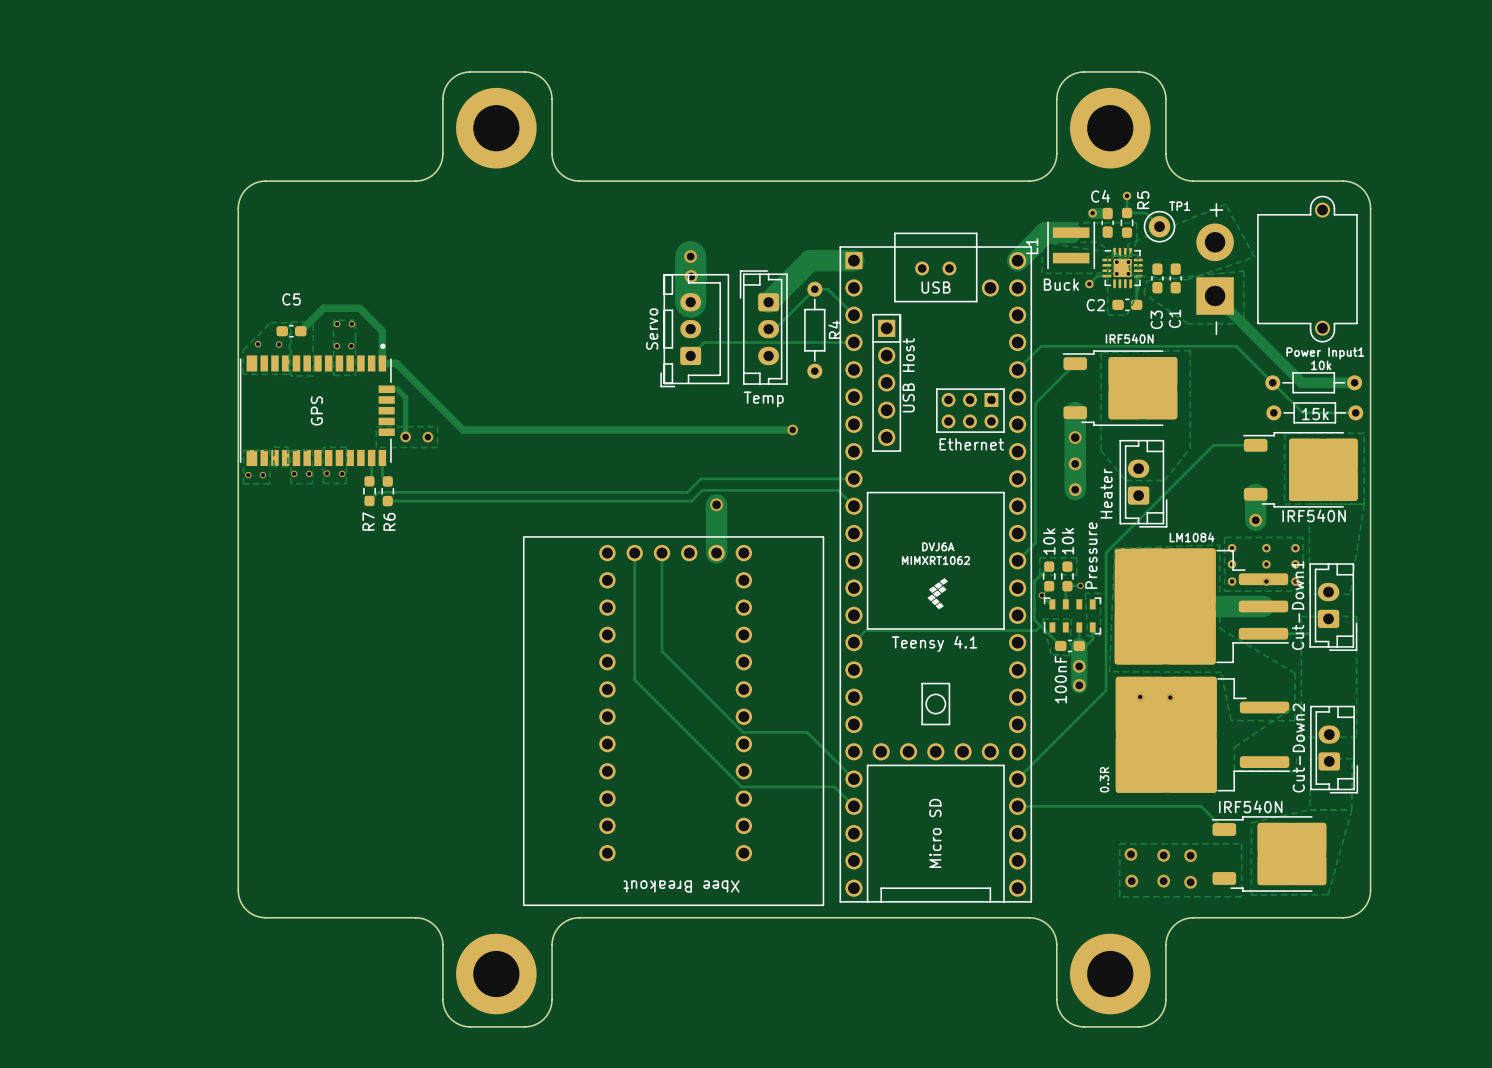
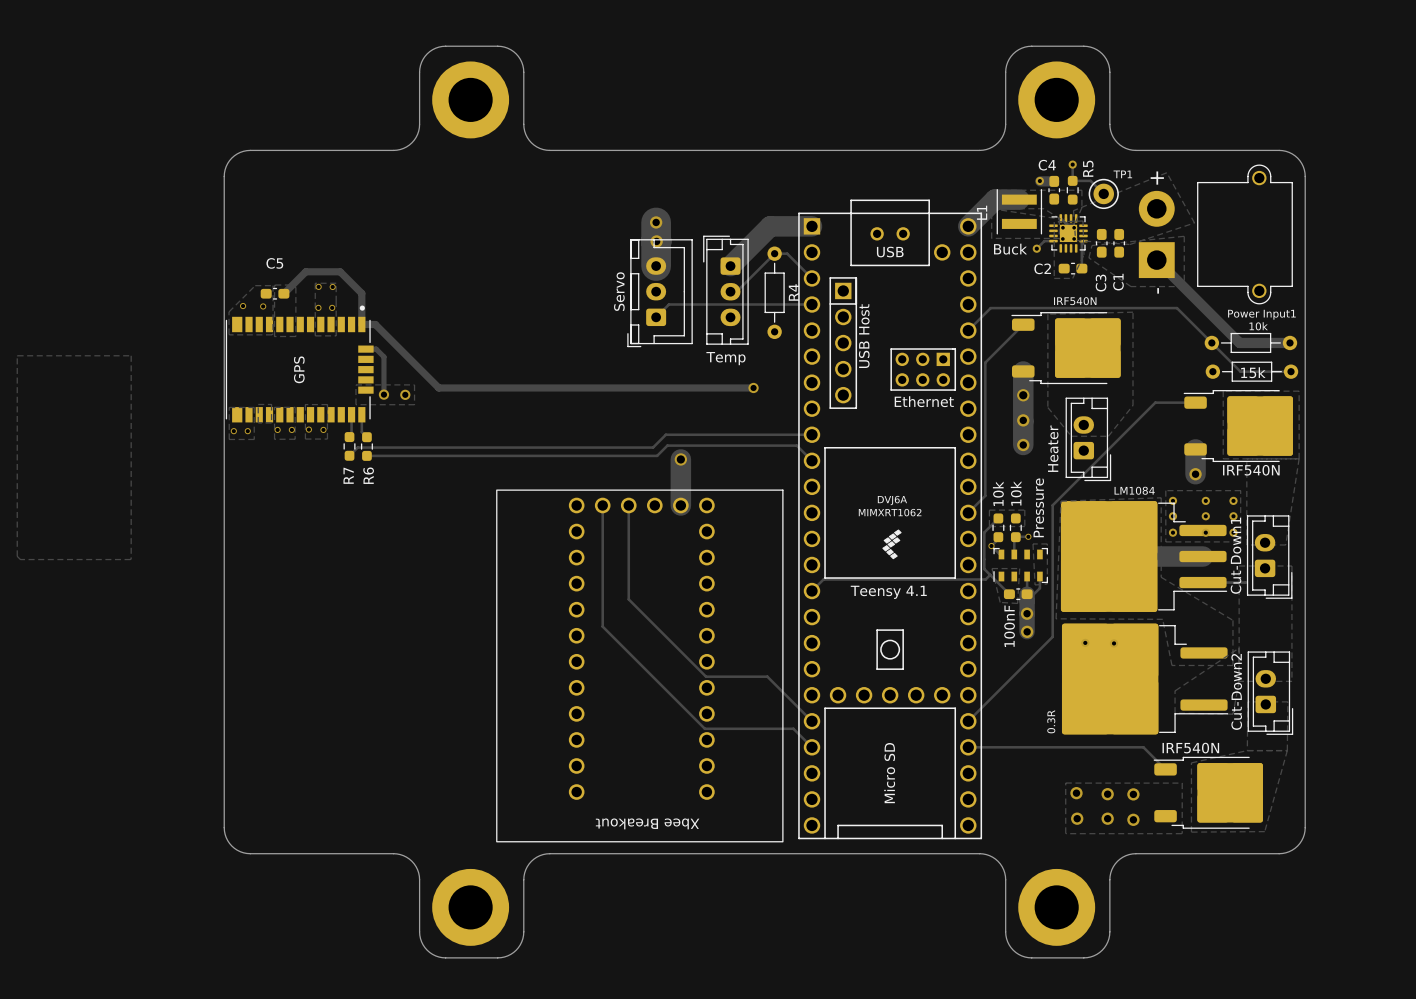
zone outline: none -> (17, 355) (17, 556) (20, 559) (130, 559) (131, 355) (17, 355)

